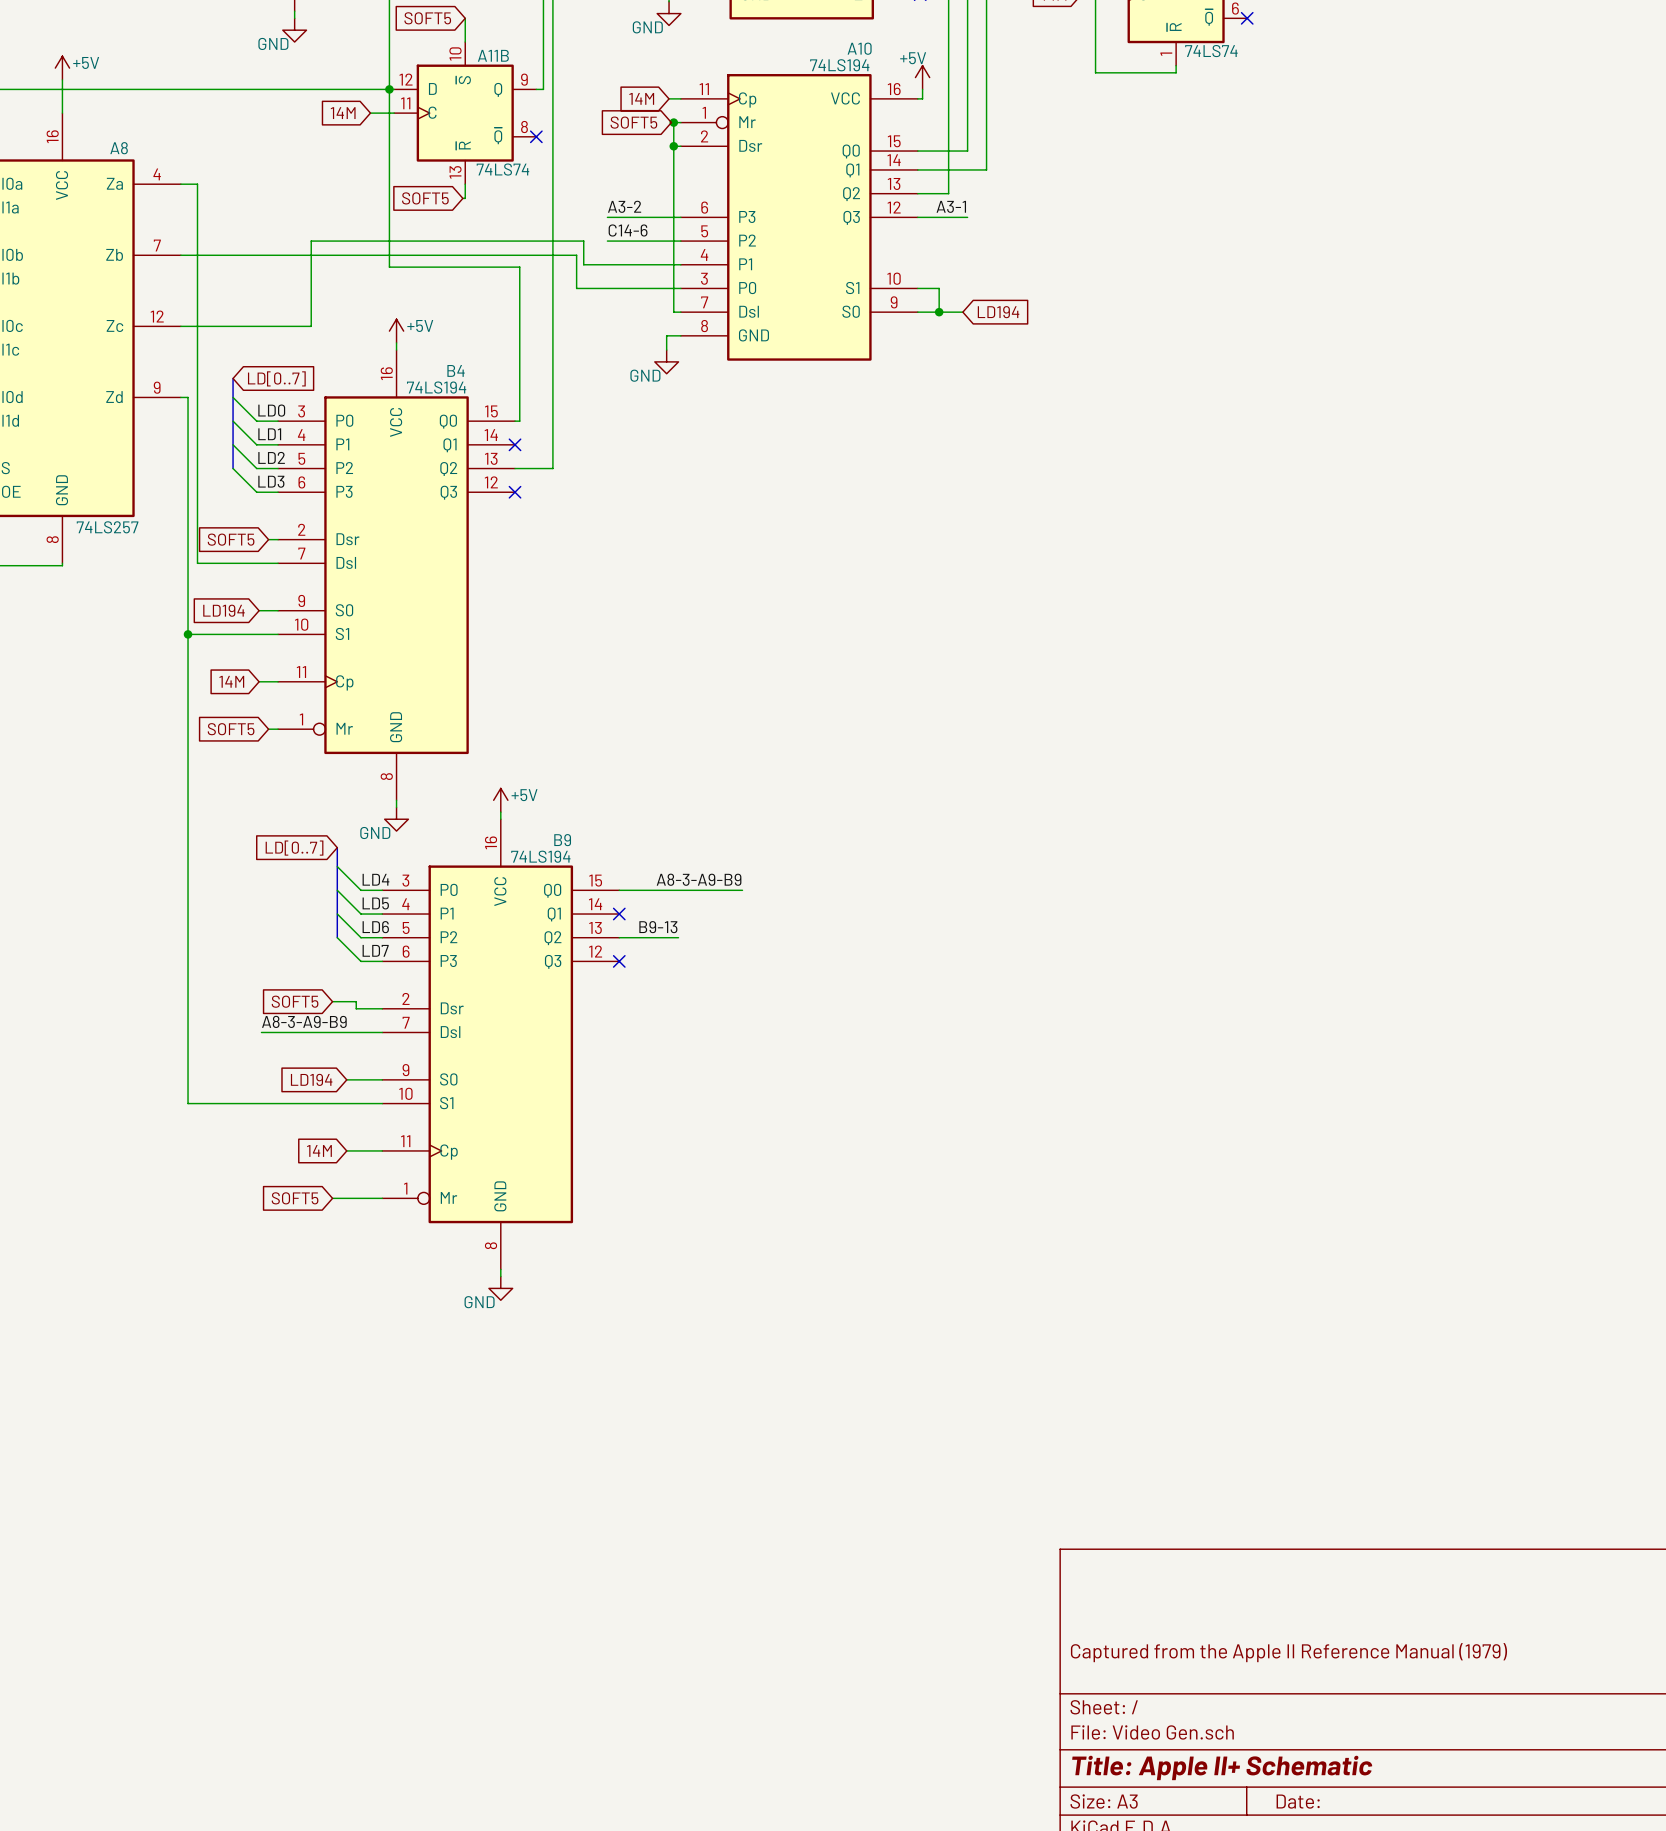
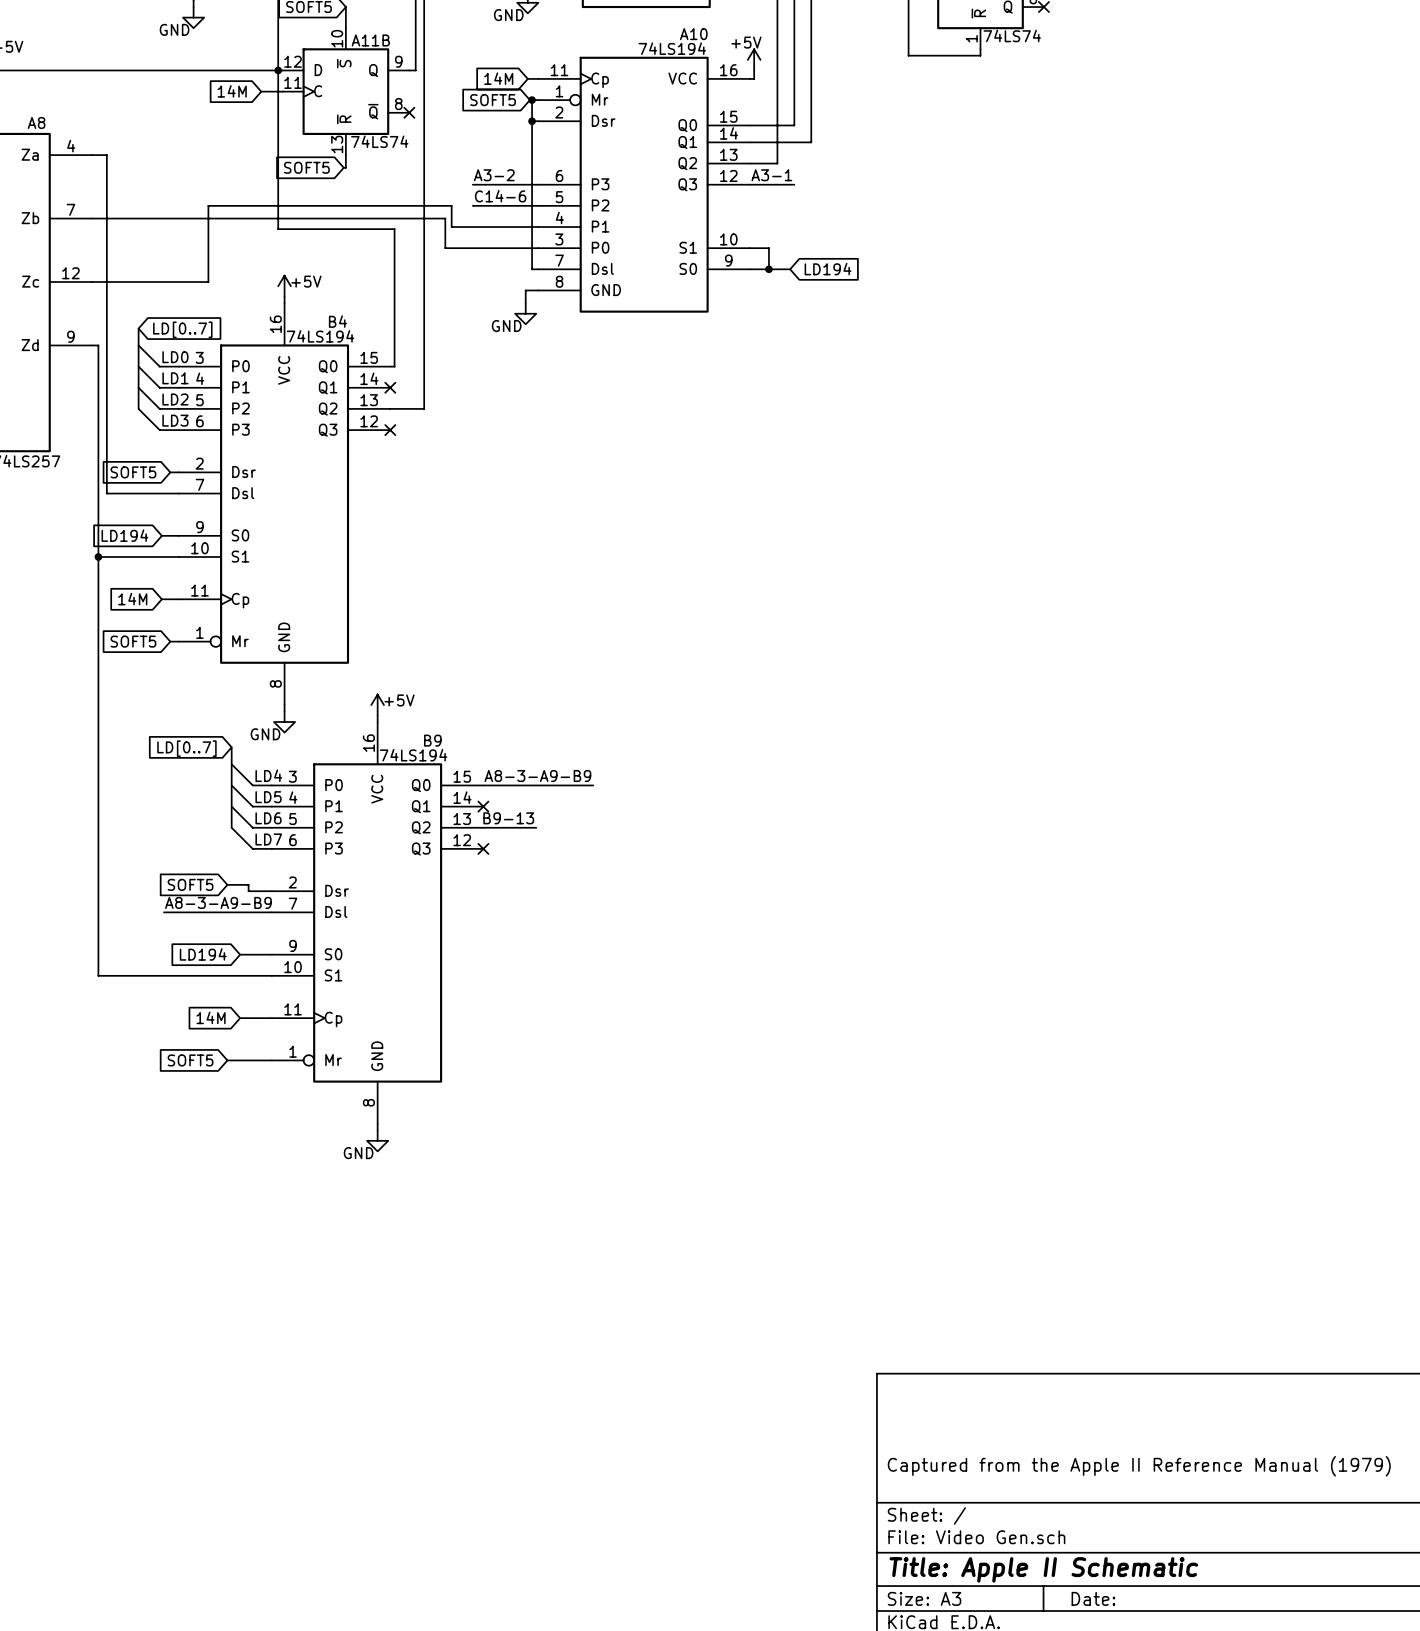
title block: Title: Apple II+ Schematic (1222, 1767) -> Title: Apple II Schematic (1043, 1569)

